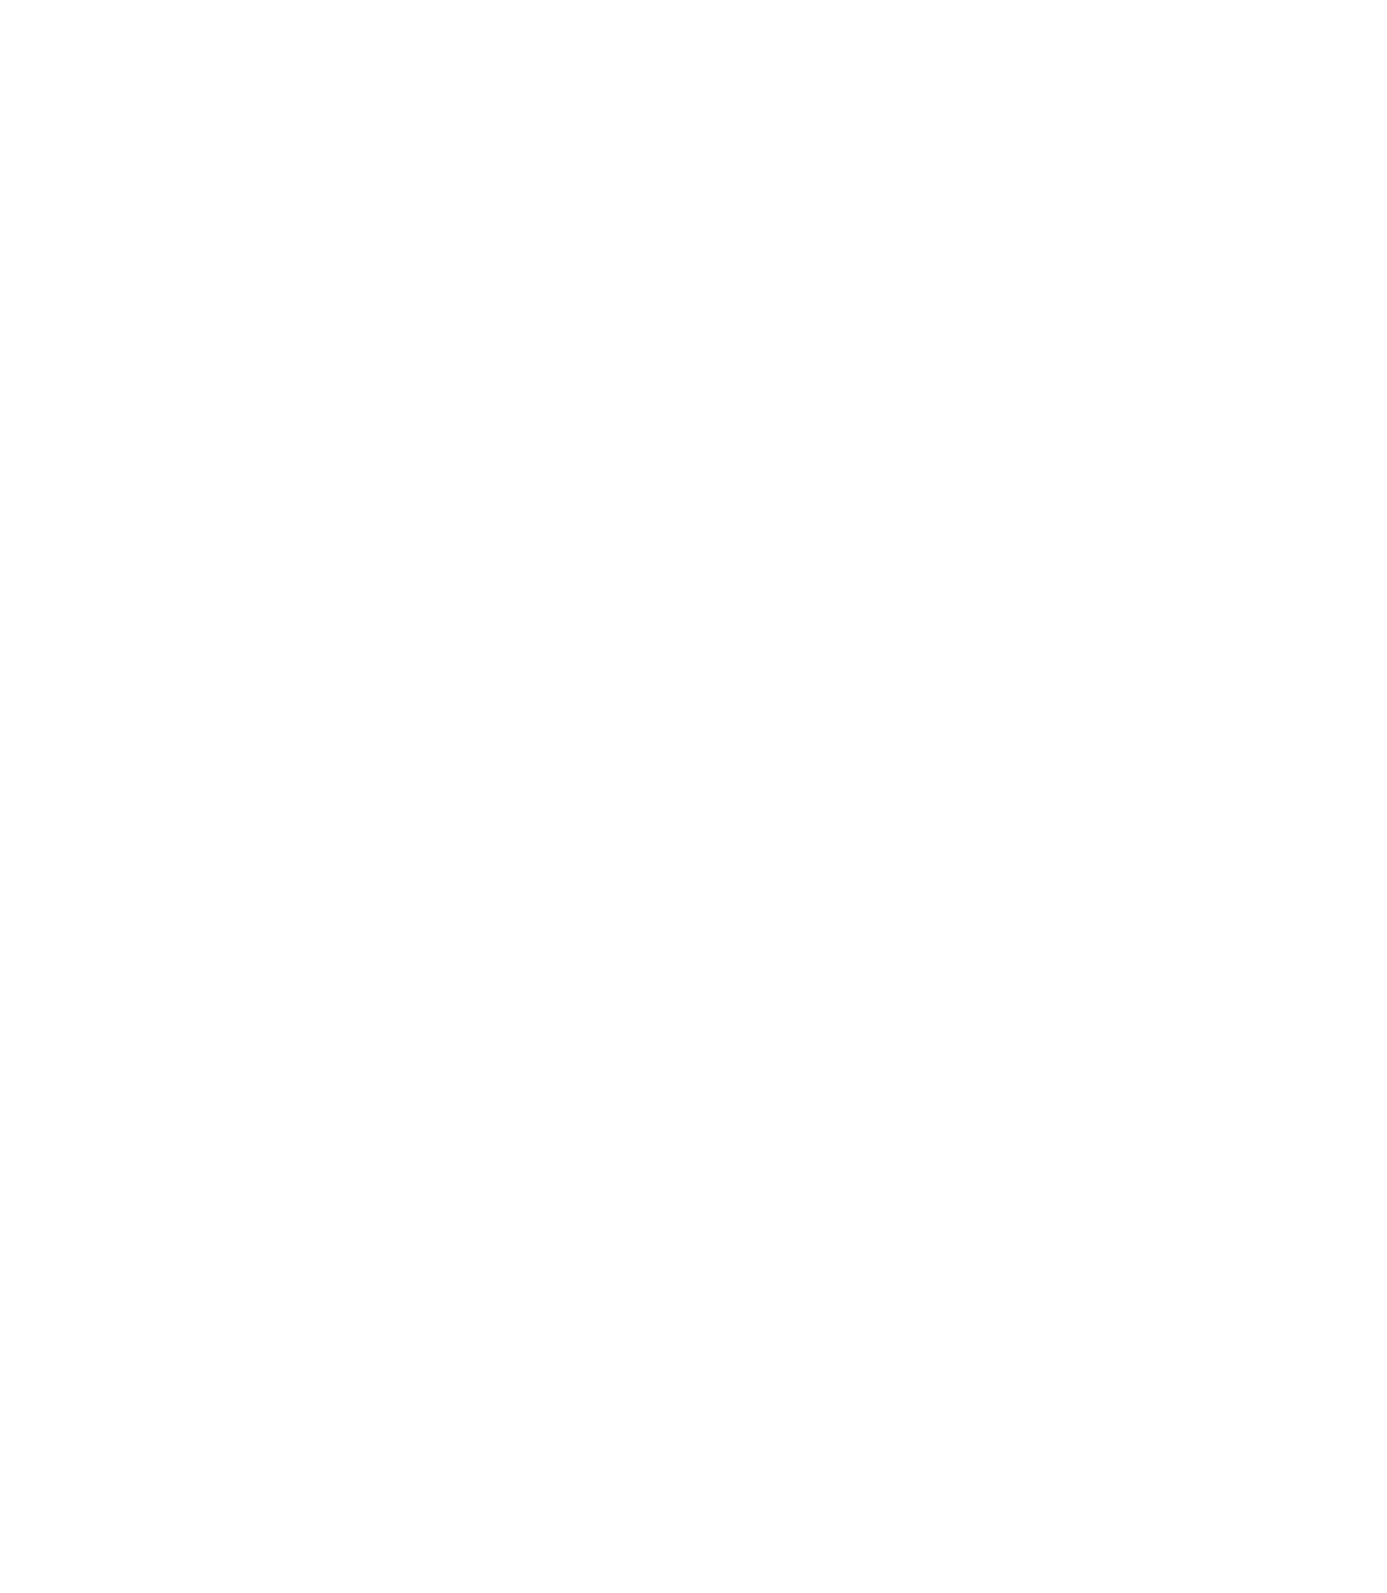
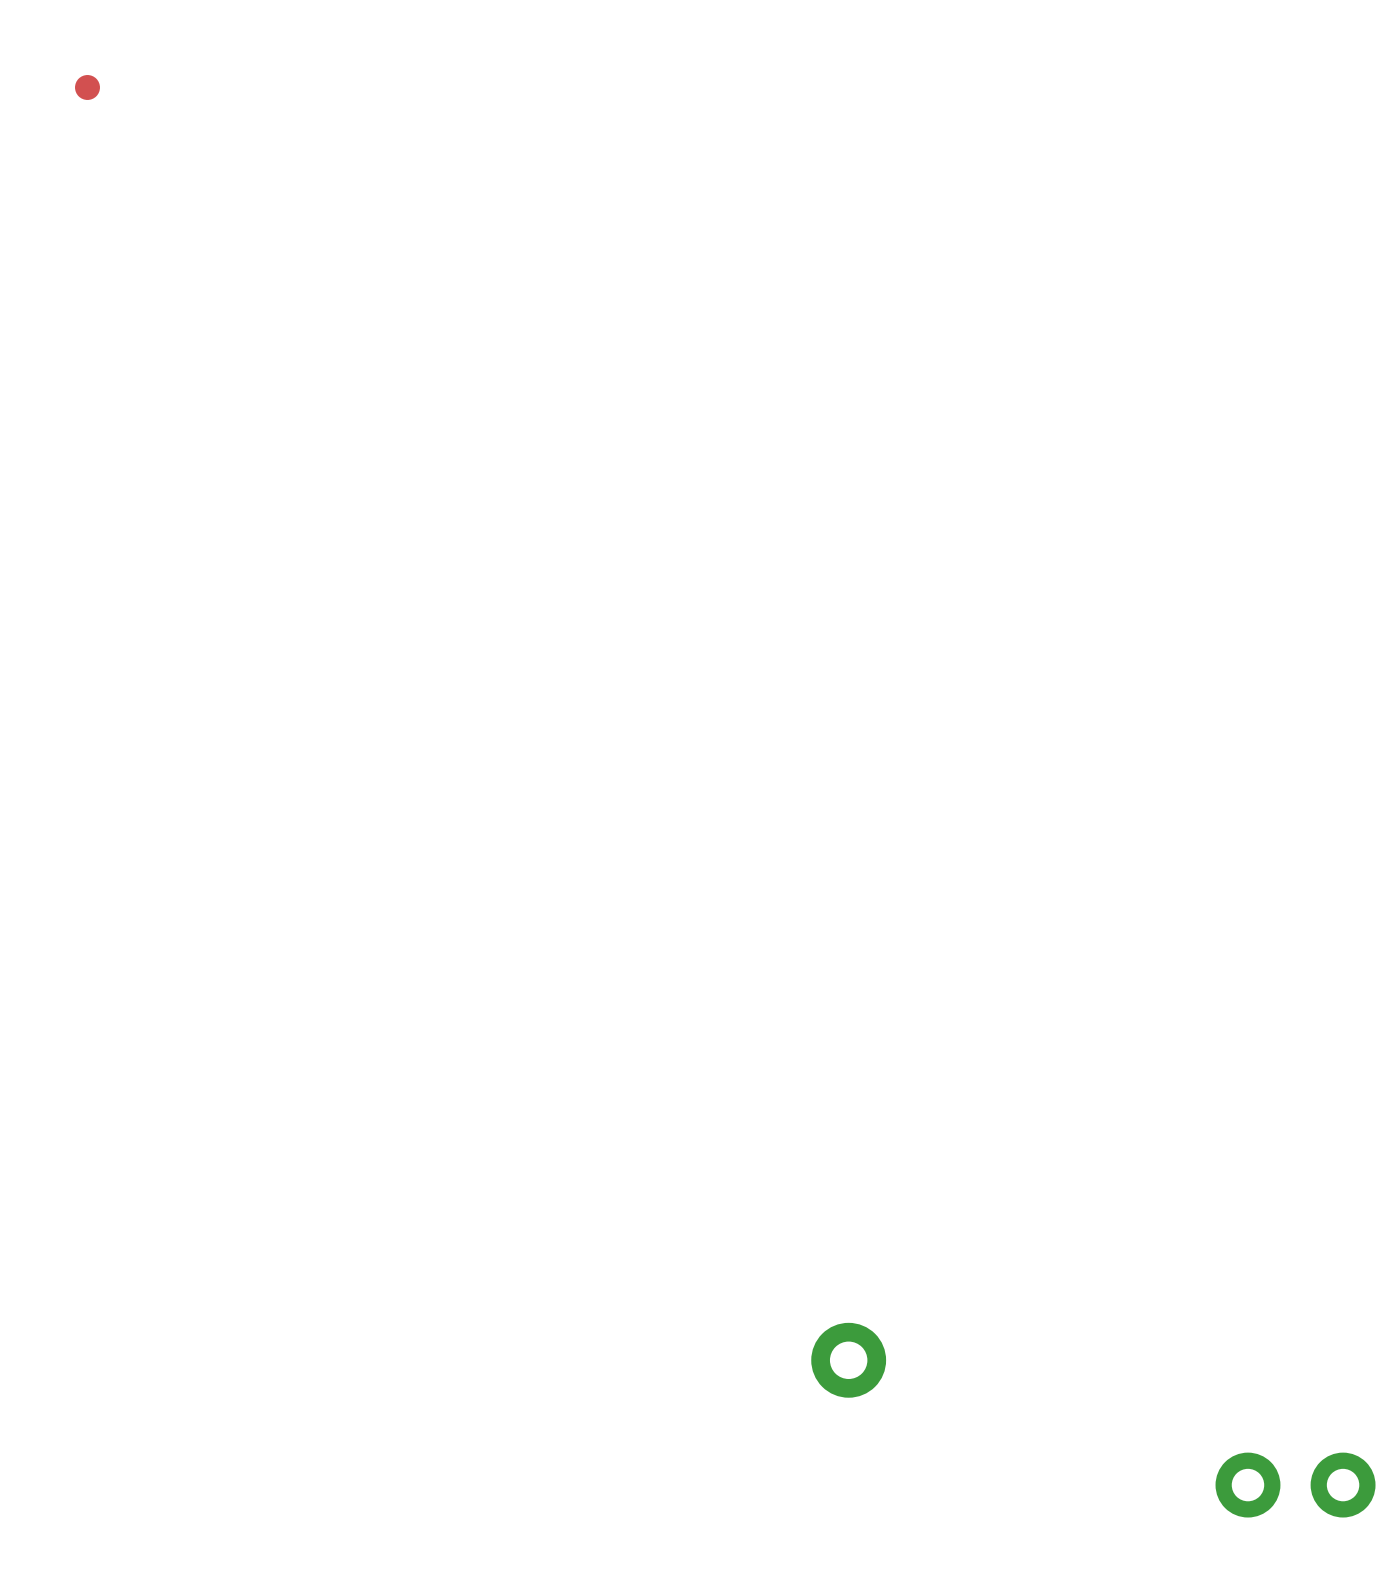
part: none -> (87, 87)
part: none -> (848, 1360)
part: none -> (1295, 1485)

